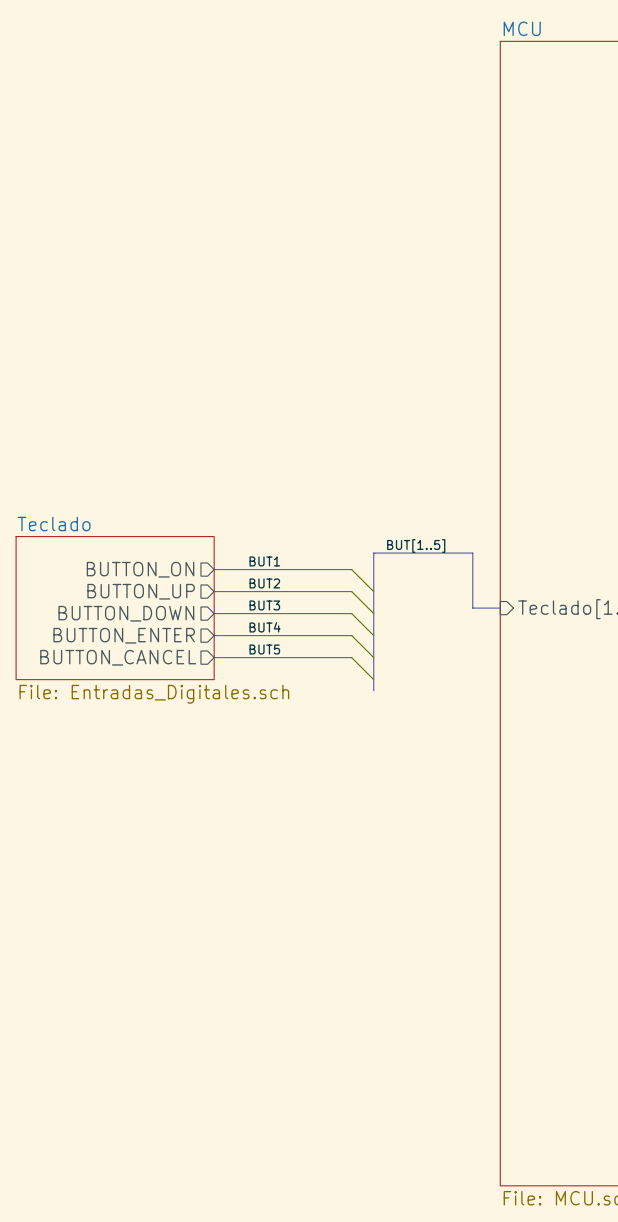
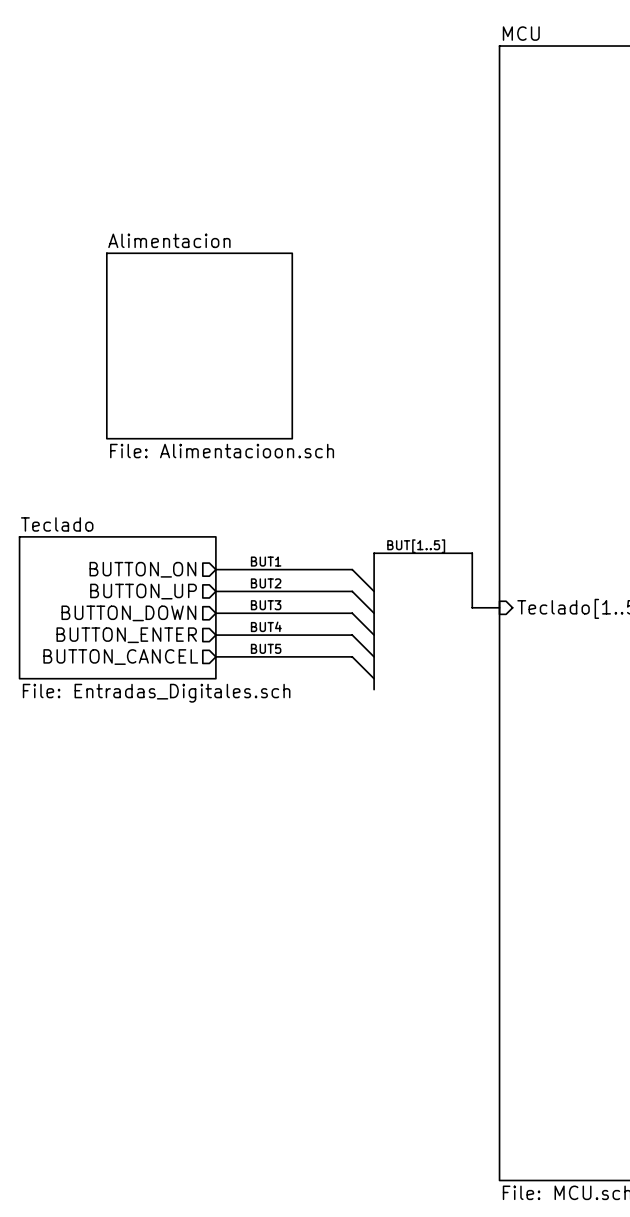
sheet Alimentacion: none -> File: Alimentacioon.sch (199, 345)

